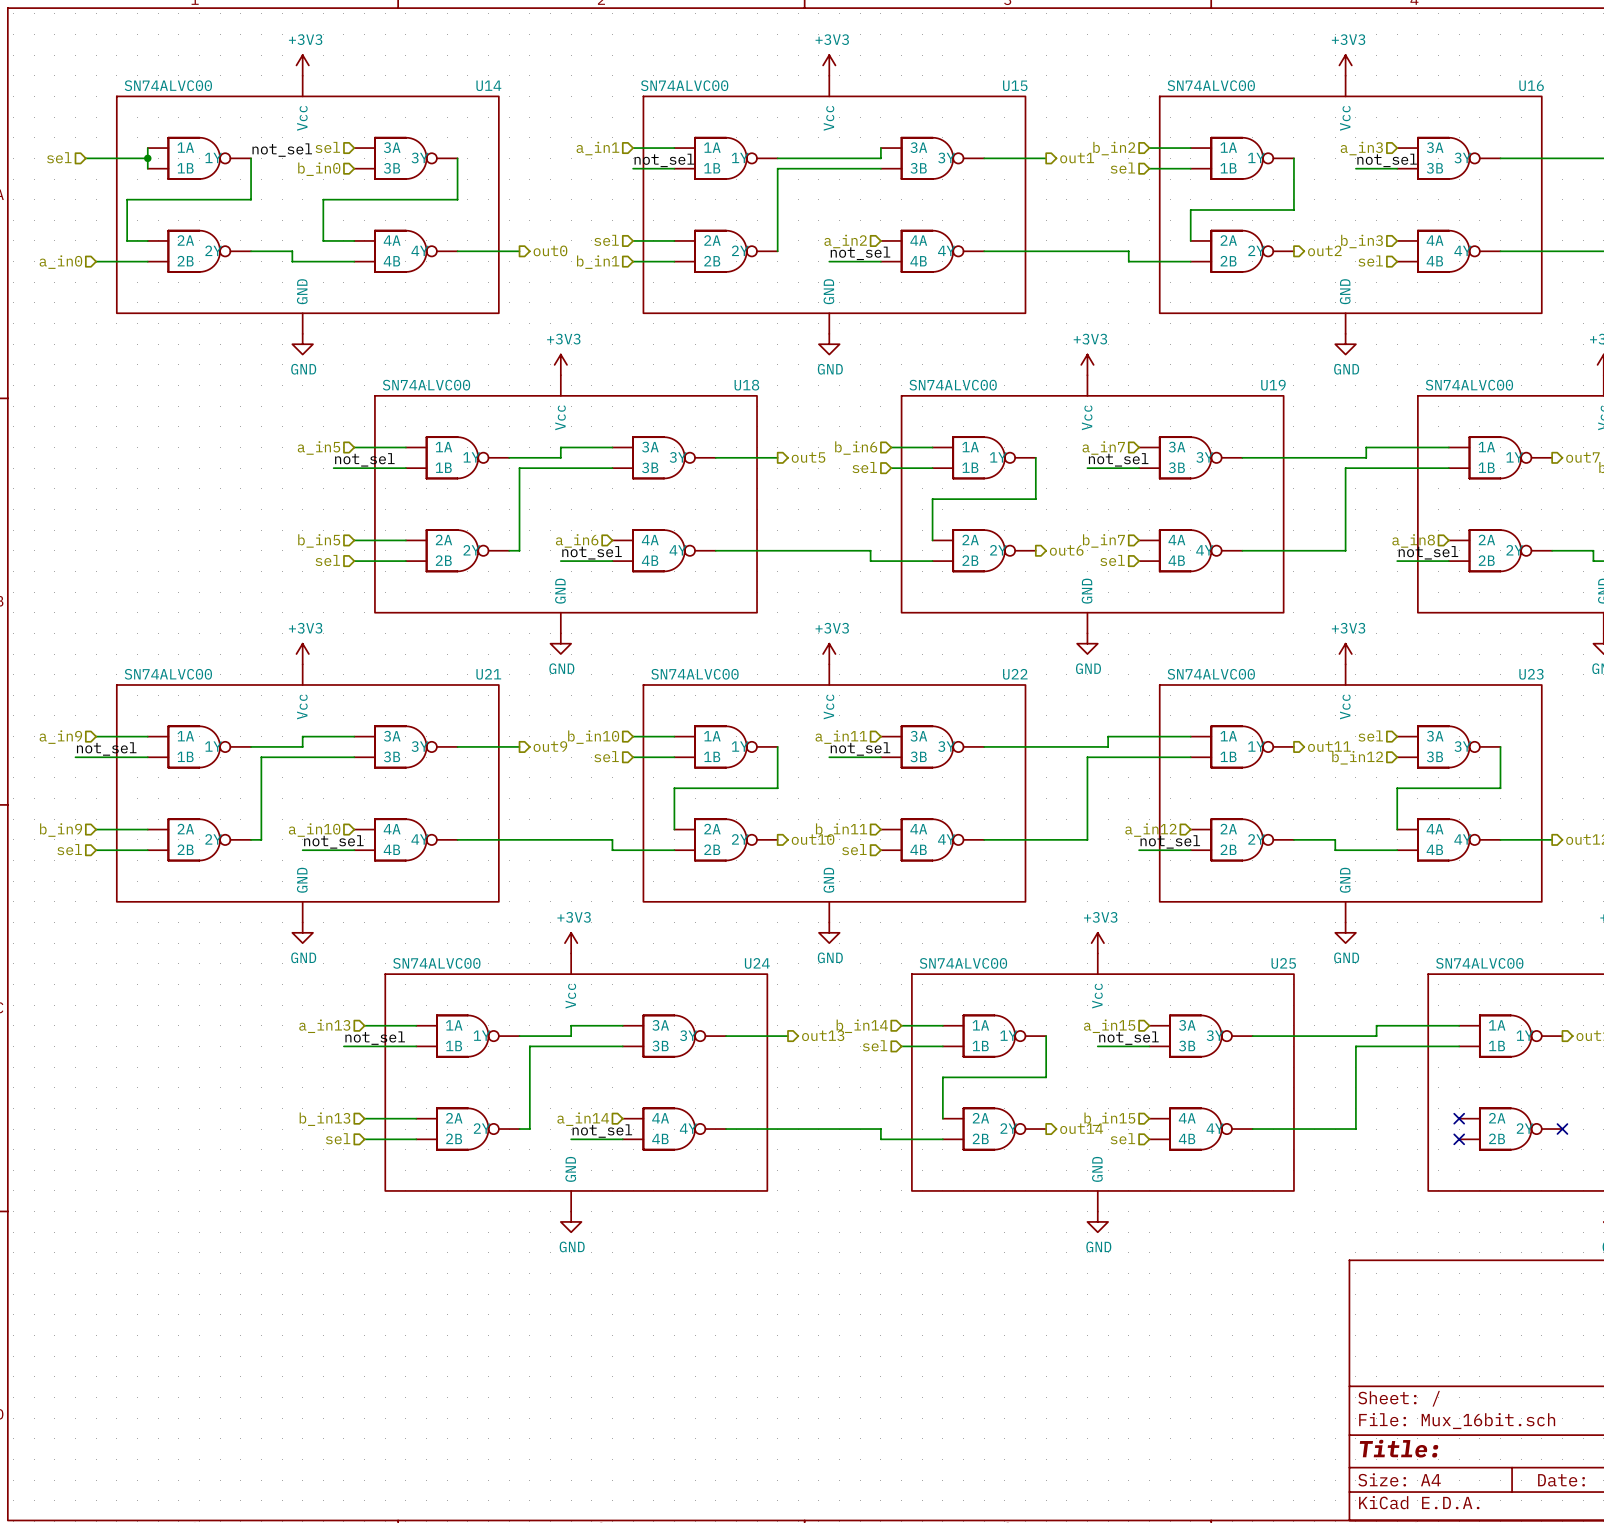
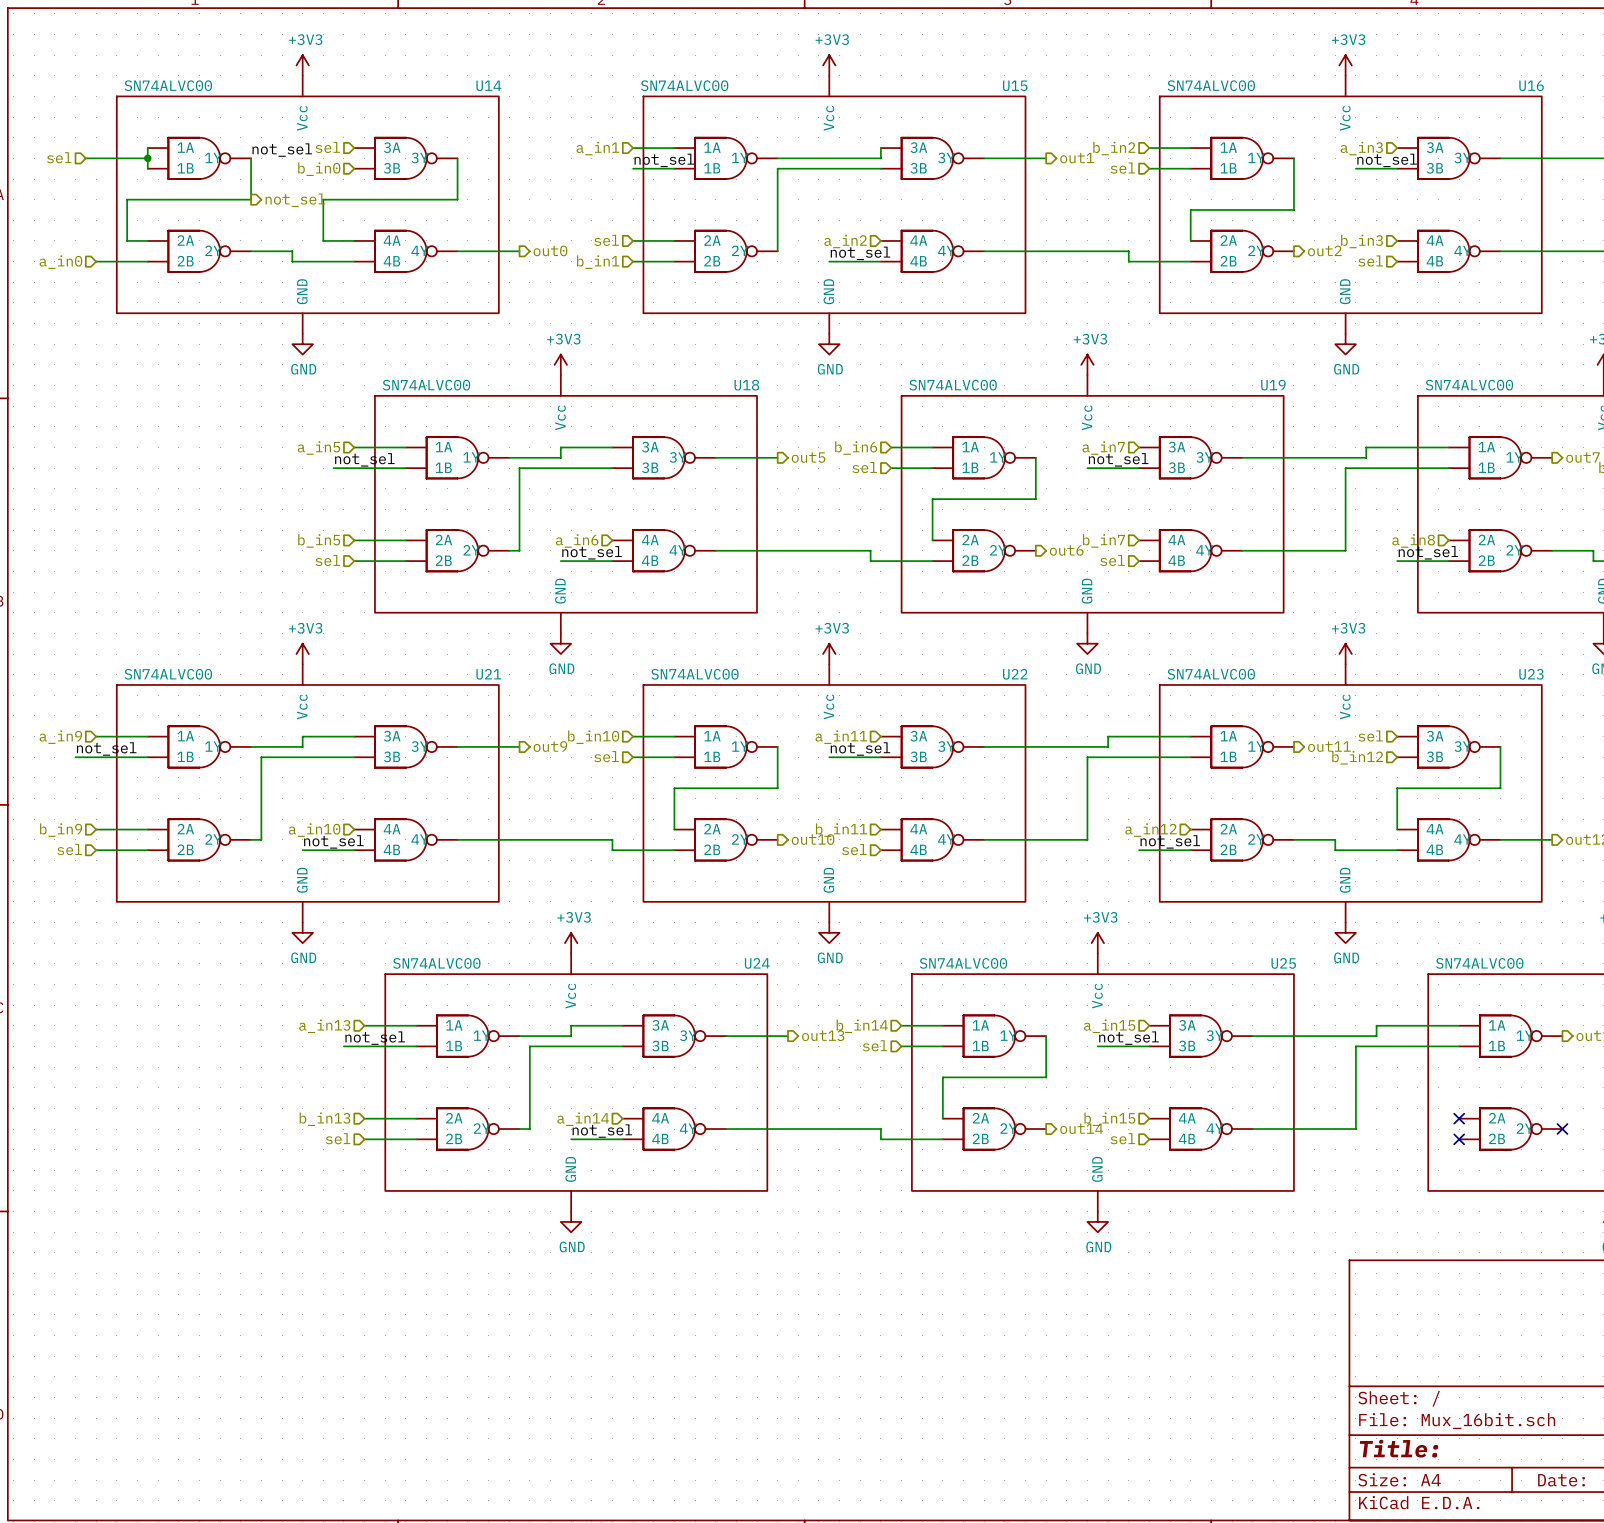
hierarchical label: none -> not_sel (295, 200)

